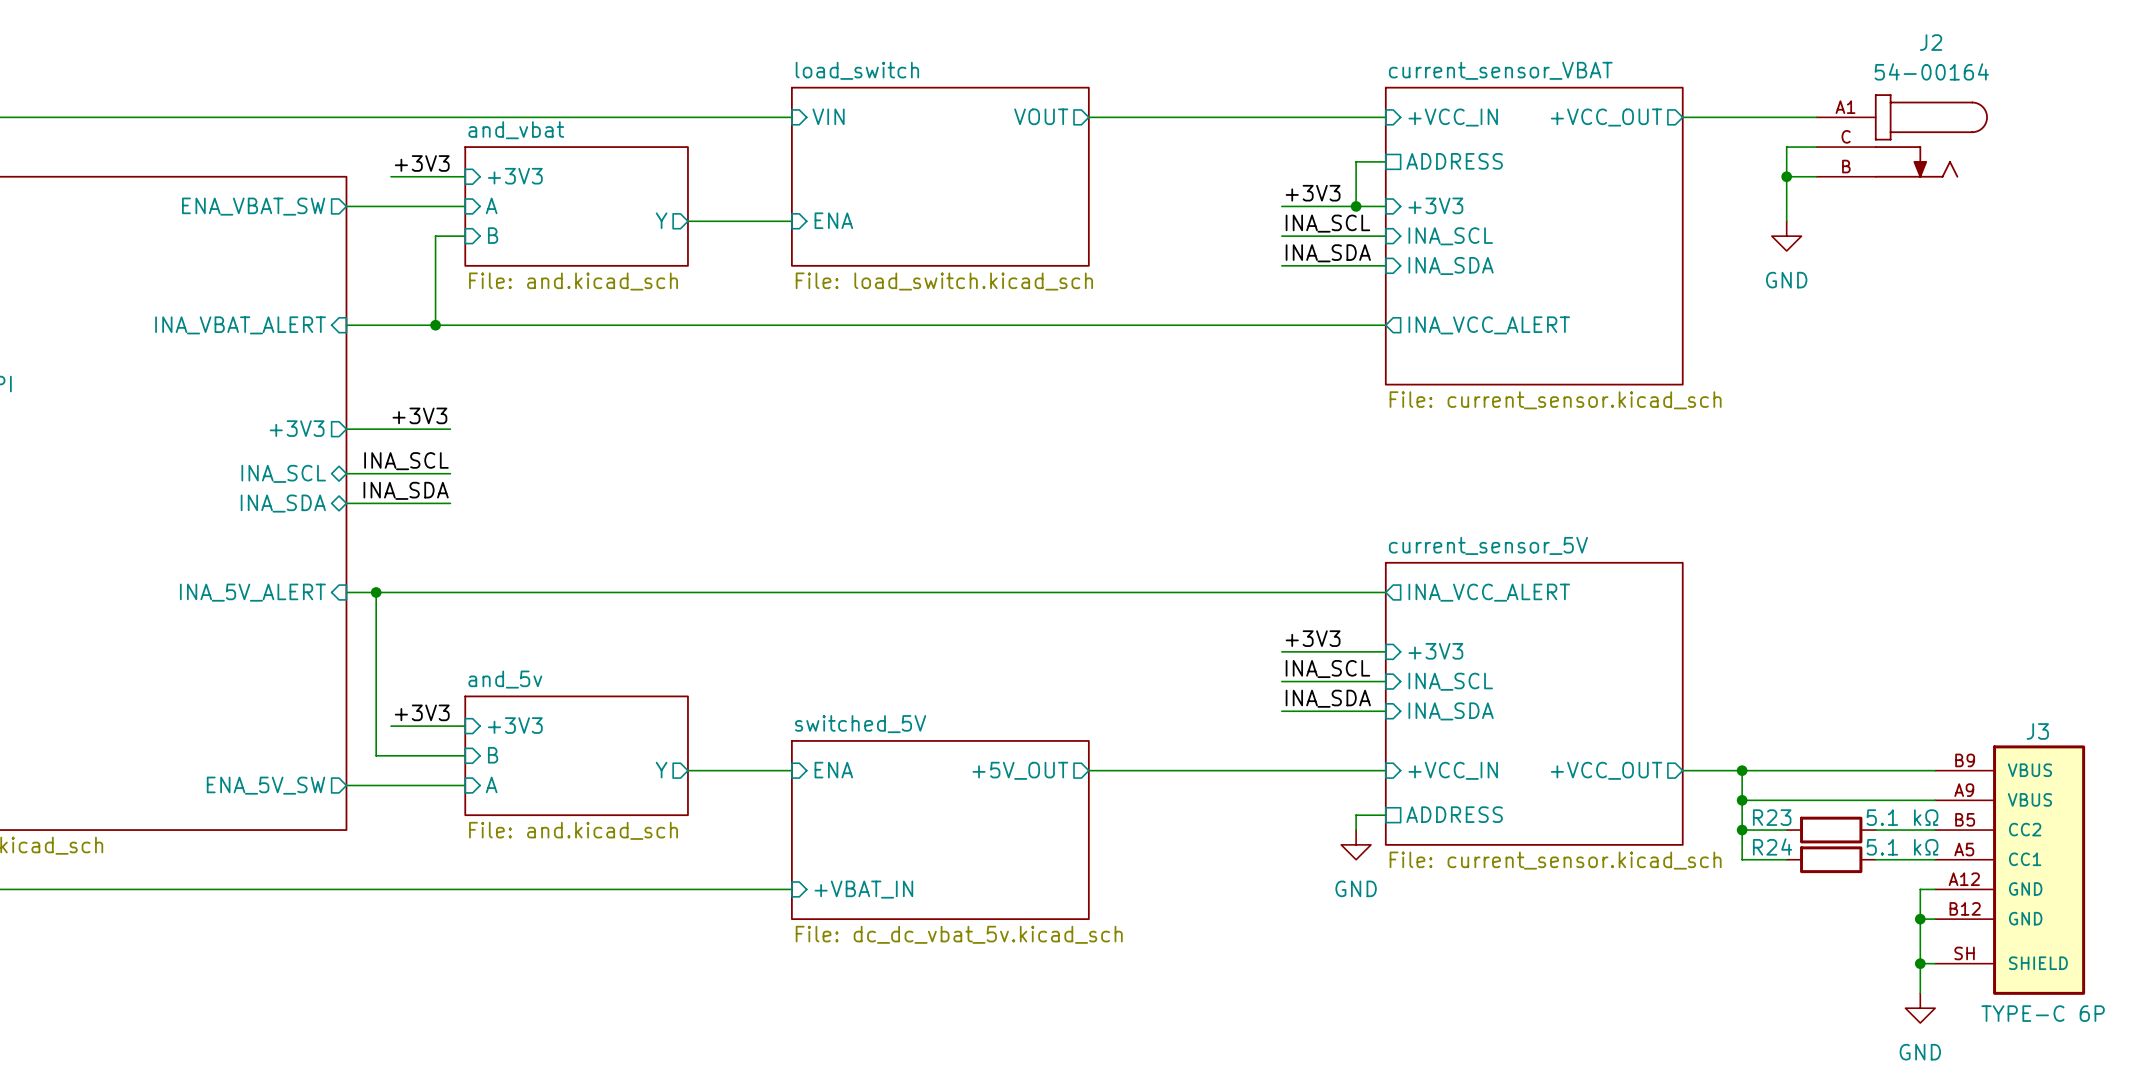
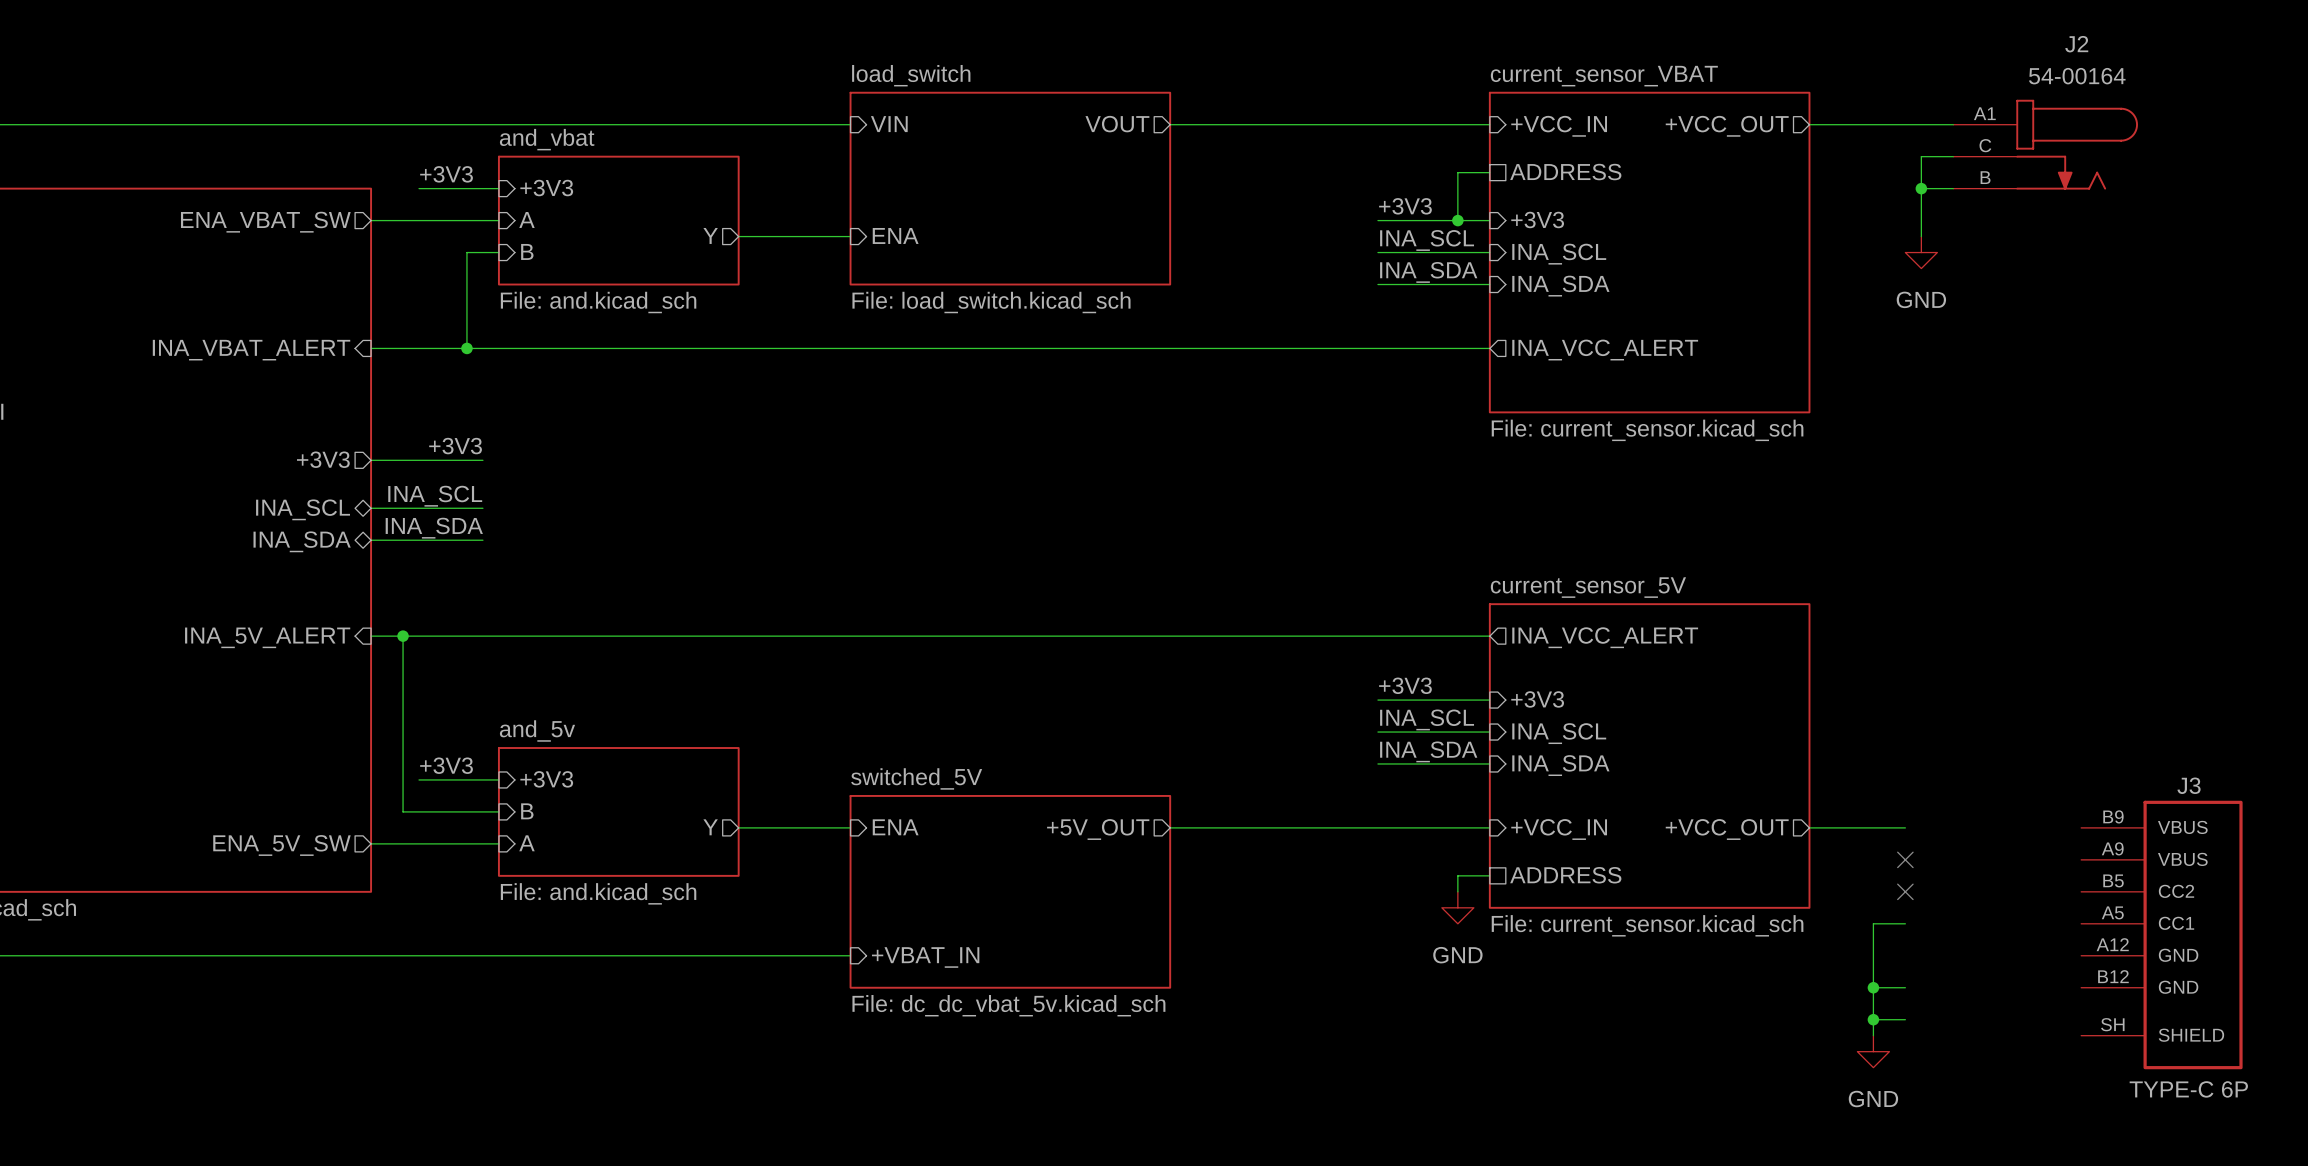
wire: (1742, 770) (1742, 859) -> (1873, 1035) (1873, 923)
junction: (1742, 770) -> none
wire: (1771, 770) (1935, 770) -> none
wire: (1742, 800) (1935, 800) -> none
junction: (1742, 800) -> none
no-connect mark: none -> (1905, 859)
wire: (1742, 830) (1786, 830) -> none
junction: (1742, 830) -> none
no-connect mark: none -> (1905, 891)
R23: 5.1 kΩ (1831, 830) -> none
wire: (1875, 830) (1935, 830) -> none
wire: (1771, 859) (1786, 859) -> none
R24: 5.1 kΩ (1831, 859) -> none
wire: (1875, 859) (1935, 859) -> none
wire: (1935, 889) (1920, 889) (1920, 993) -> none
wire: none -> (1873, 987) (1905, 987)
junction: none -> (1873, 987)
wire: (1920, 919) (1935, 919) -> none
junction: (1920, 919) -> none
wire: none -> (1873, 1019) (1905, 1019)
junction: none -> (1873, 1019)
wire: (1920, 963) (1935, 963) -> none
junction: (1920, 963) -> none
power symbol position: GND (1920, 1008) -> GND (1873, 1051)

